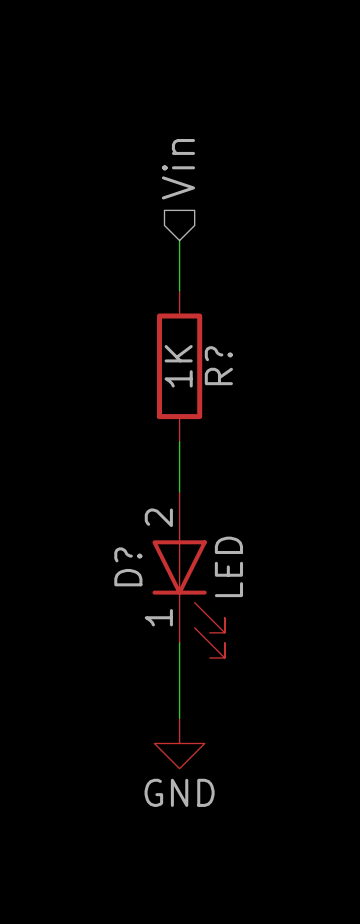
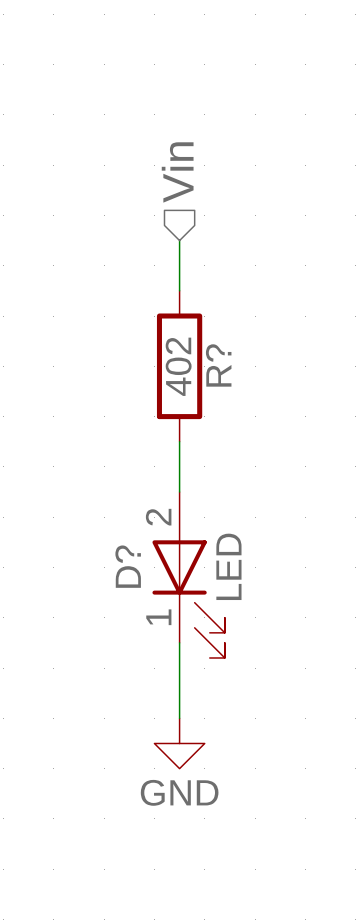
R? value: 1K (178, 366) -> 402 (178, 366)

